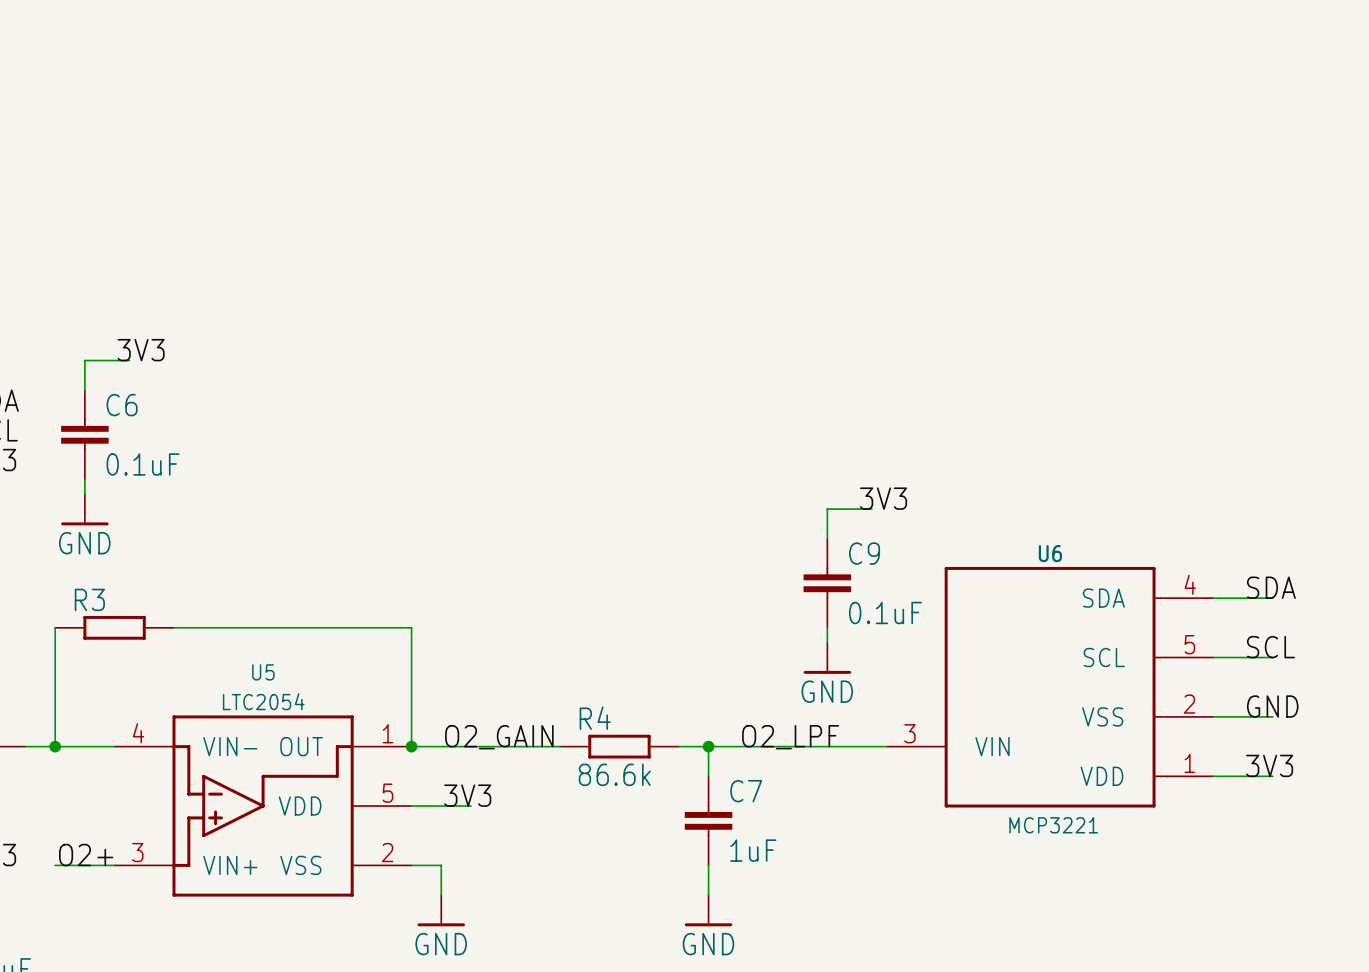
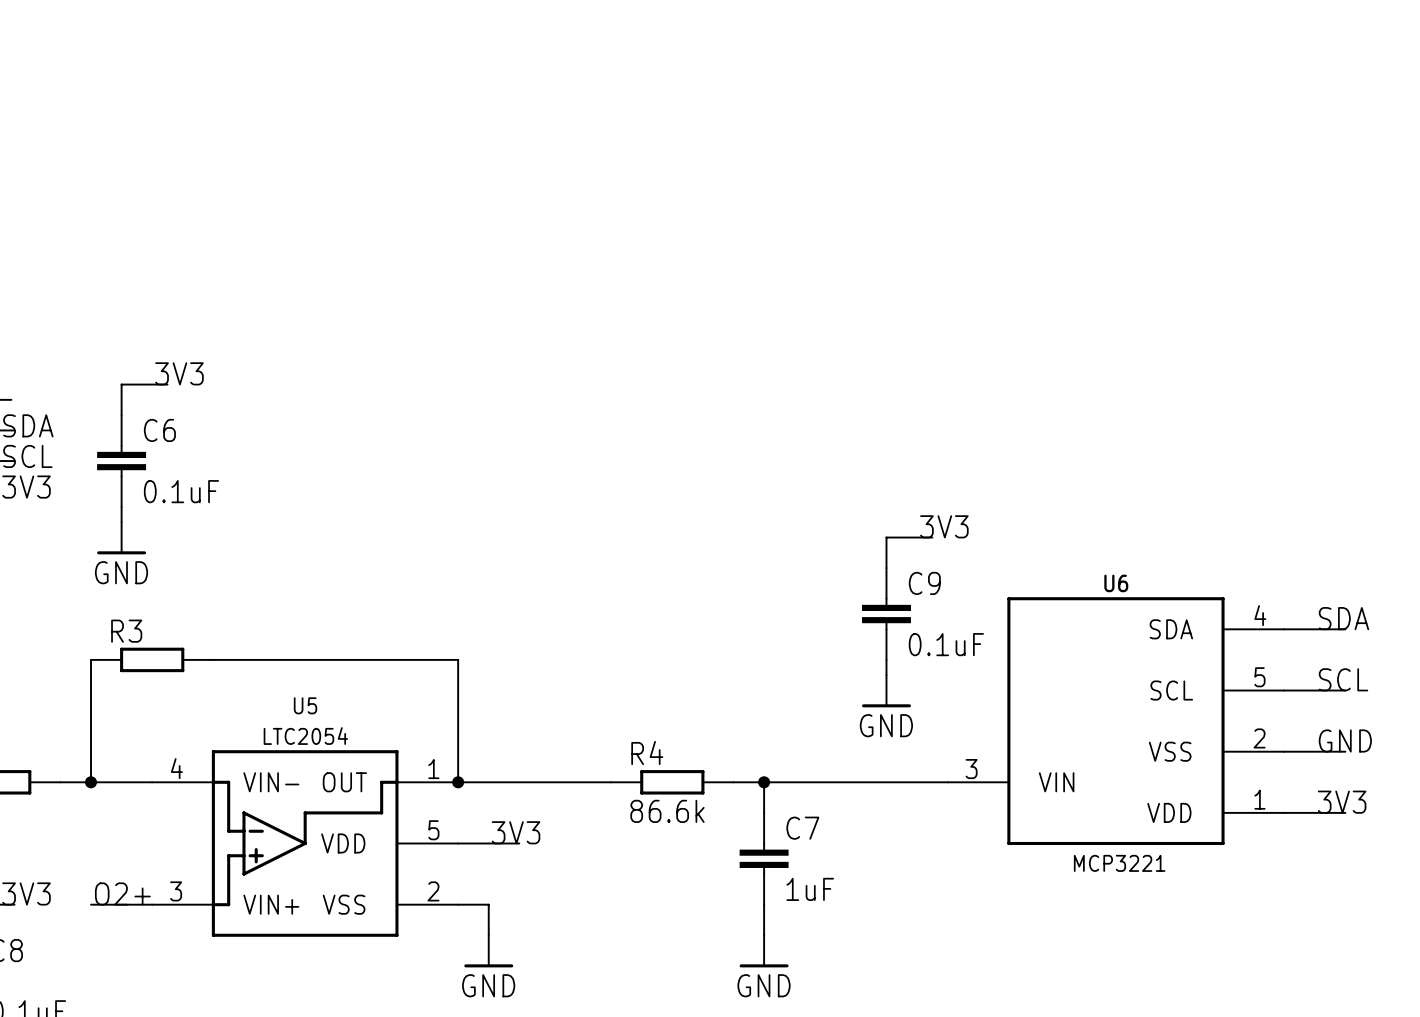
label: O2_GAIN (499, 737) -> none
label: O2_LPF (790, 737) -> none

